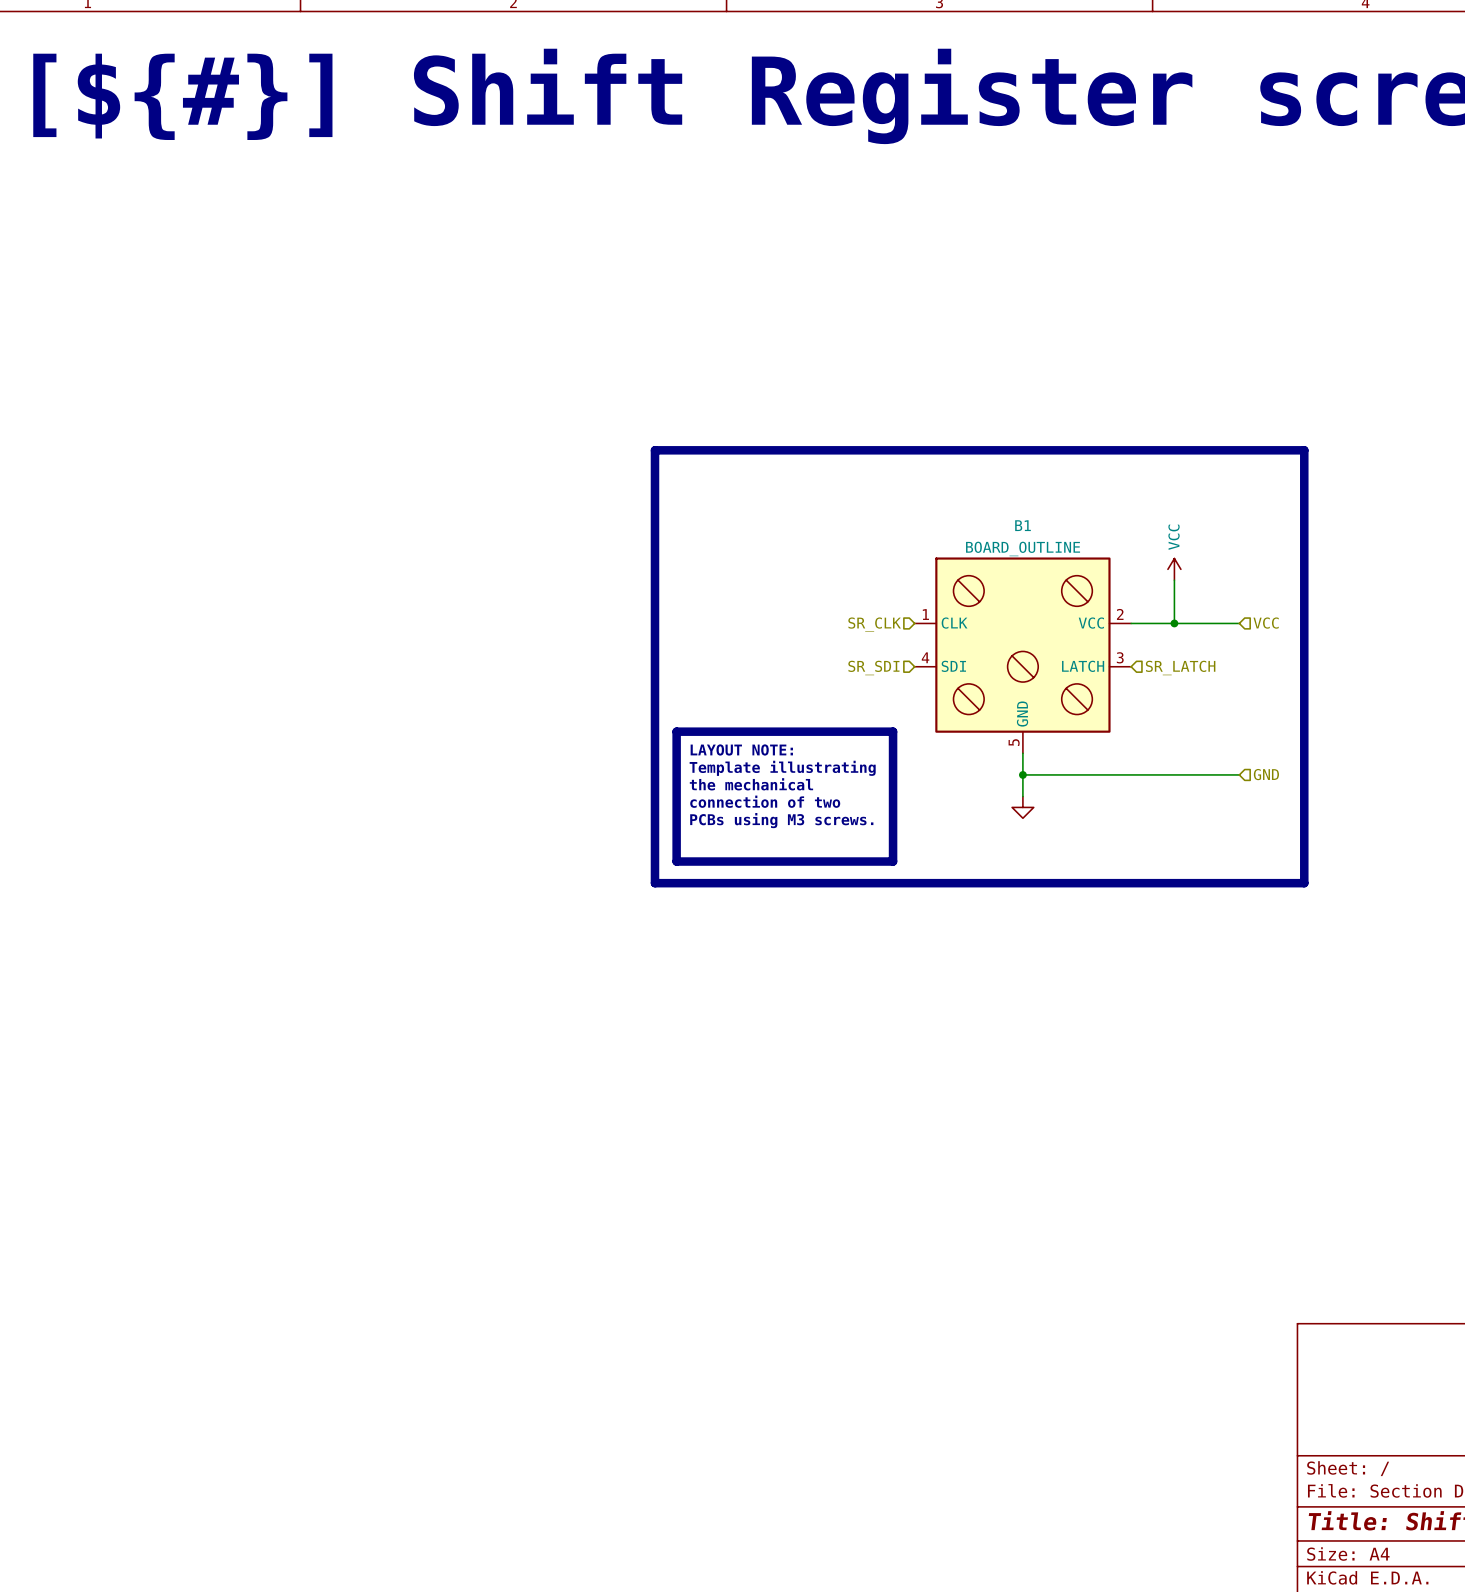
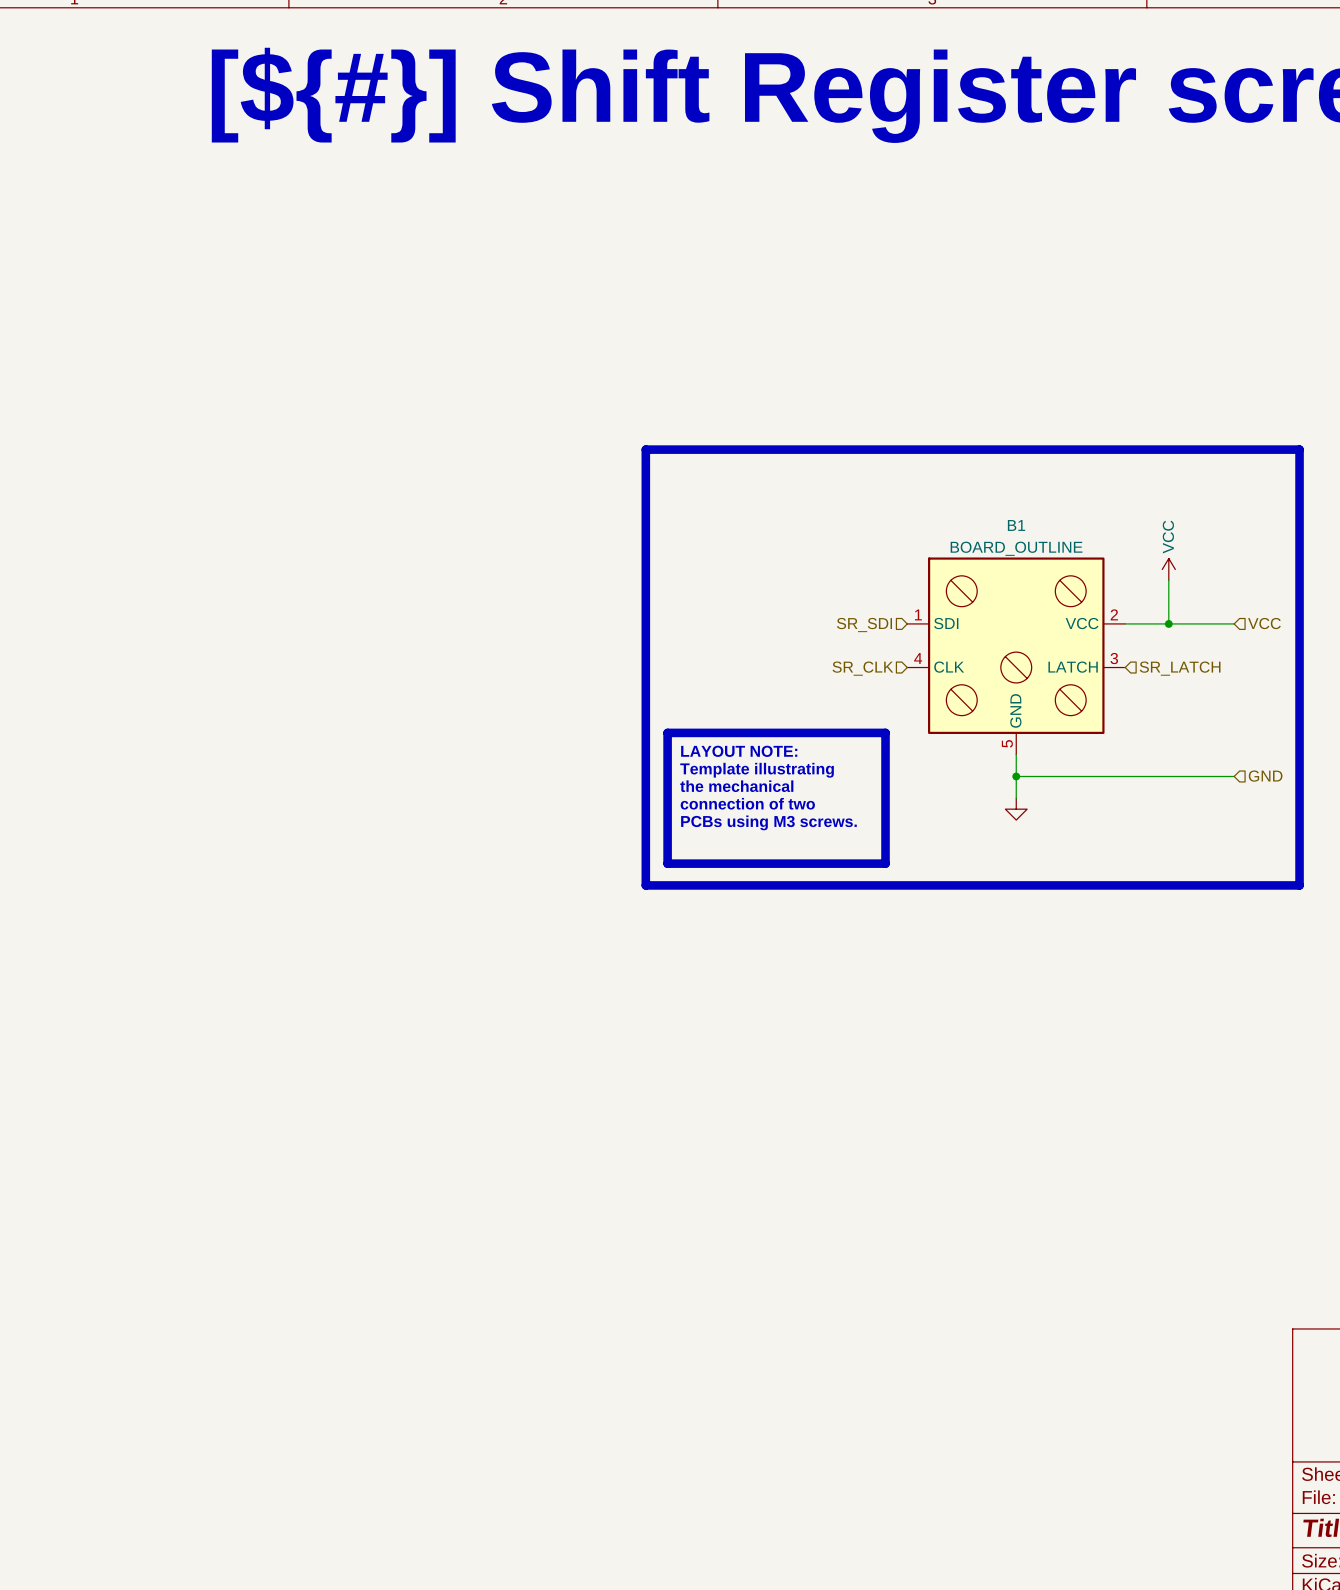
B1 pin name: CLK (954, 623) -> SDI (946, 623)
hierarchical label: SR_CLK (874, 624) -> SR_SDI (864, 625)
B1 pin name: SDI (953, 666) -> CLK (949, 667)
hierarchical label: SR_SDI (873, 667) -> SR_CLK (862, 668)

